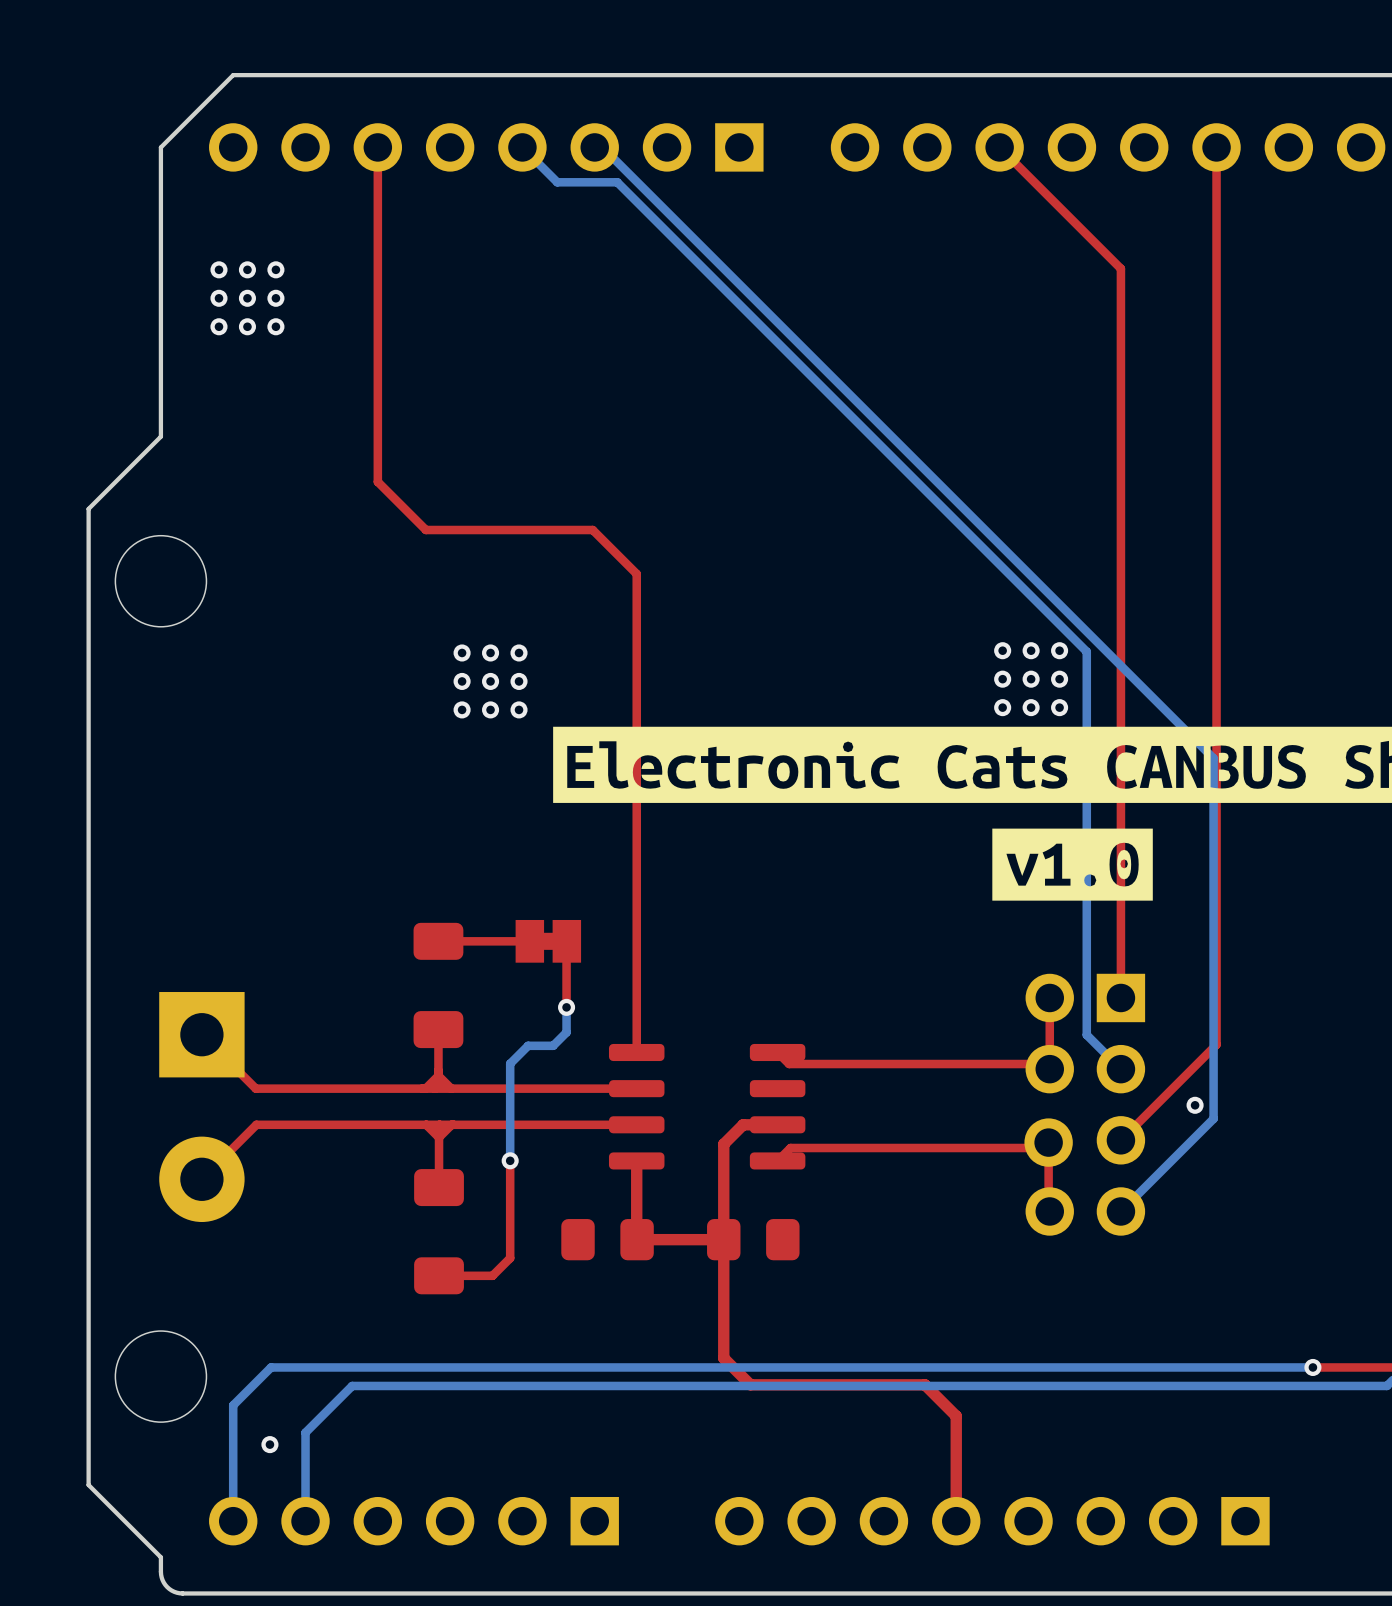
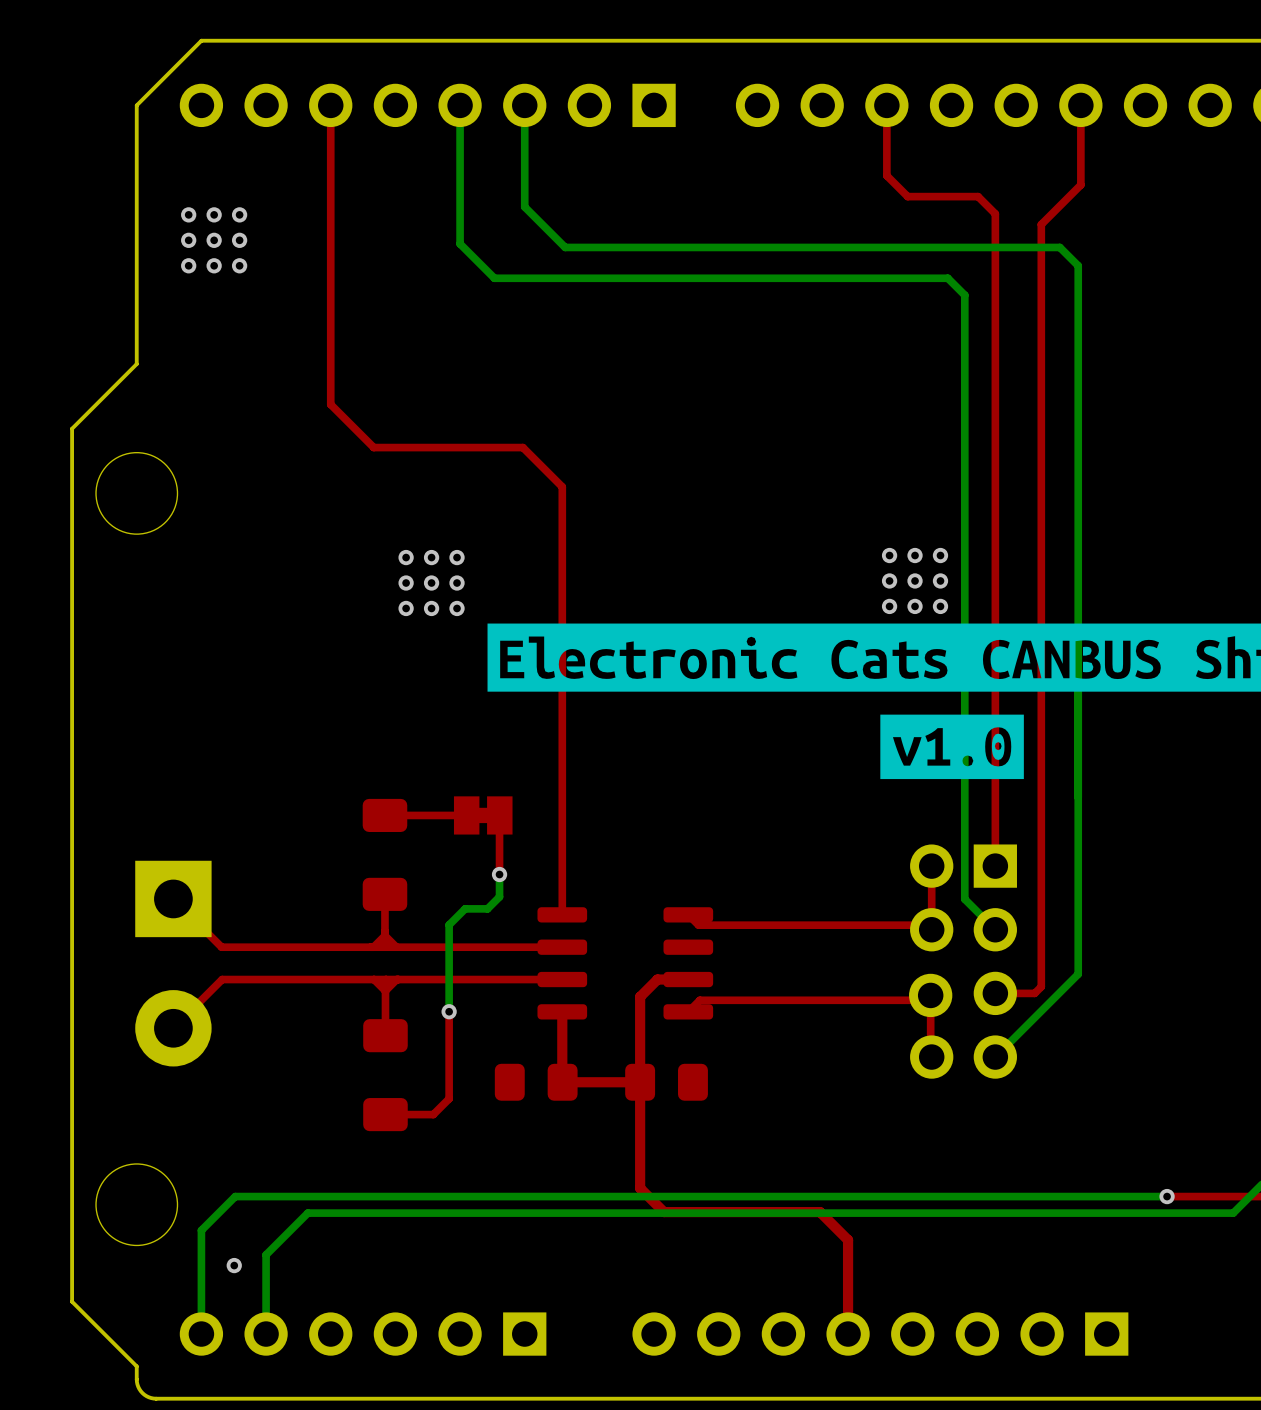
bottom track: (522, 147) (557, 182) (617, 182) (1086, 651) -> (460, 105) (460, 243) (494, 278) (947, 278) (964, 295) (964, 556)
bottom track: (602, 147) (1213, 758) -> (524, 105) (524, 206) (565, 247) (1059, 247) (1078, 265) (1078, 651)
top track: (999, 147) (1101, 249) -> (886, 105) (886, 175) (907, 196) (978, 196)
top track: (1216, 236) (1216, 1044) (1120, 1140) -> (1080, 184) (1041, 224) (1041, 986) (1034, 993) (995, 993)
via: (1195, 1105) -> none

